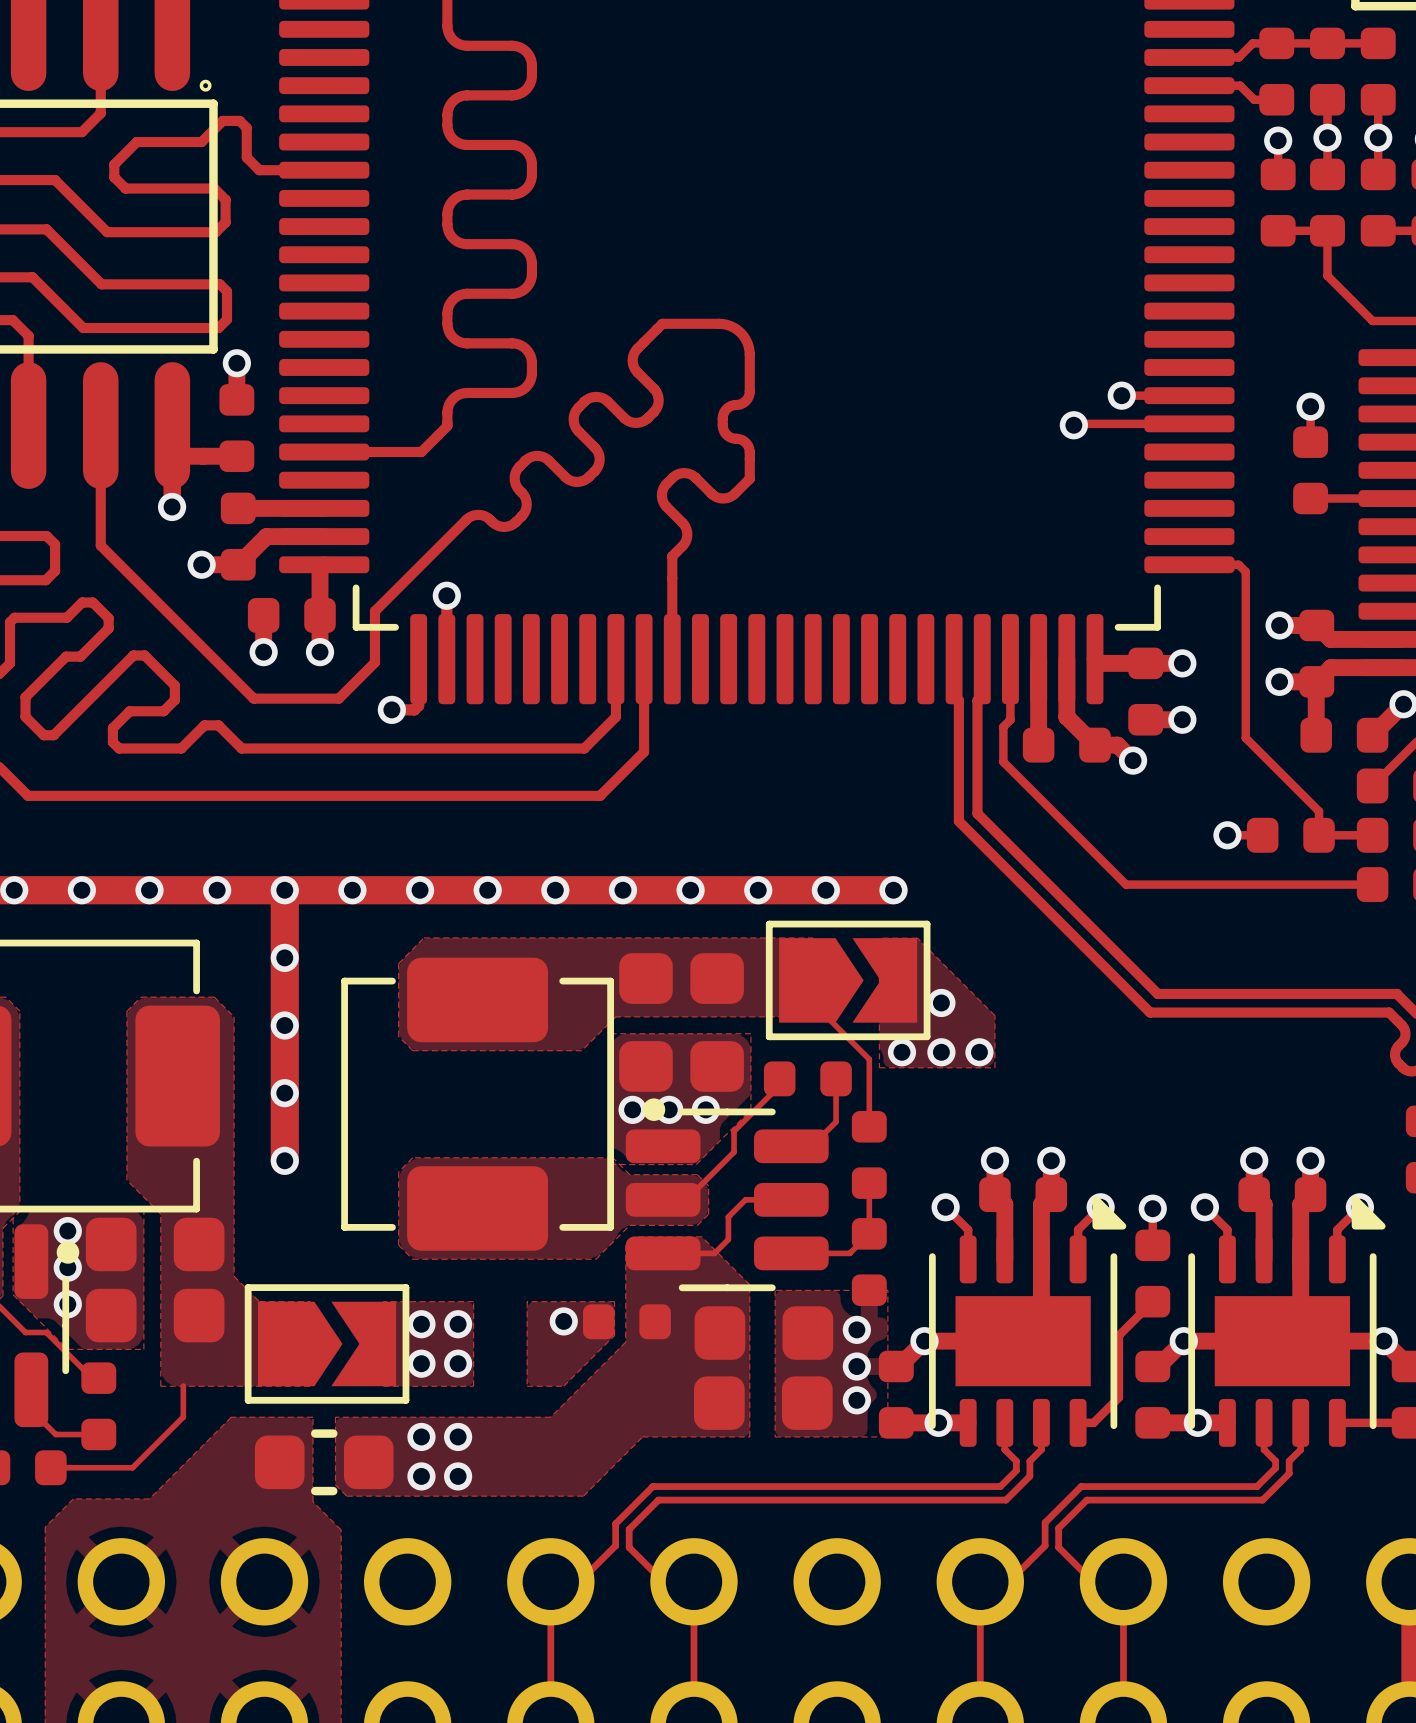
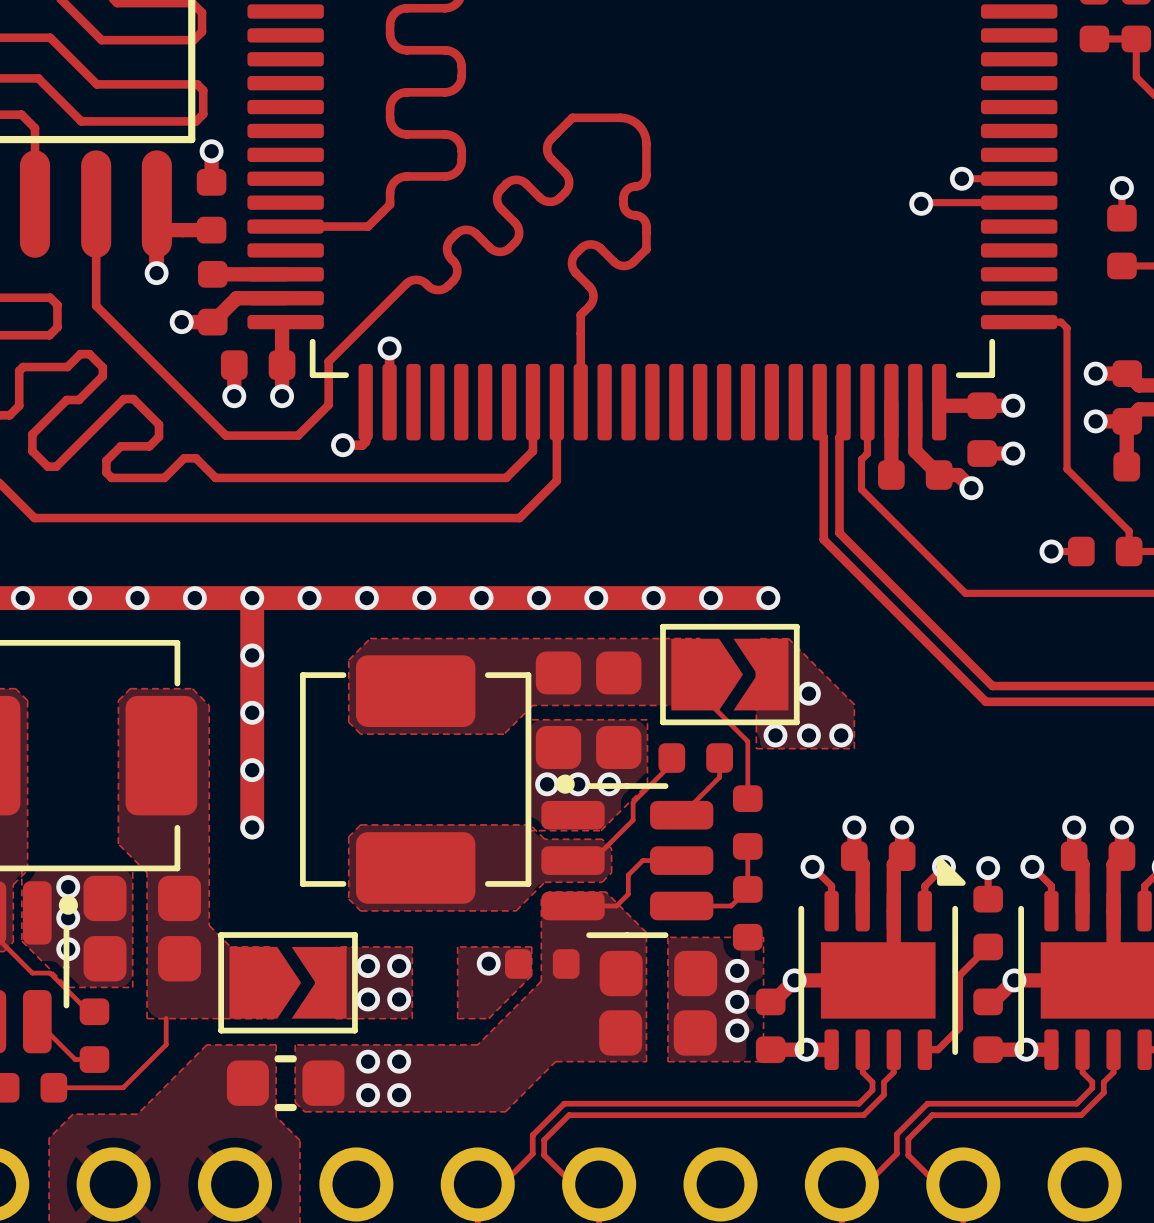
track: (836, 1101) (836, 1121) (811, 1146) (791, 1146) -> (719, 777) (681, 815)
track: (31, 1389) (31, 1410) (55, 1434) (76, 1434) -> (37, 1021) (75, 1059)

